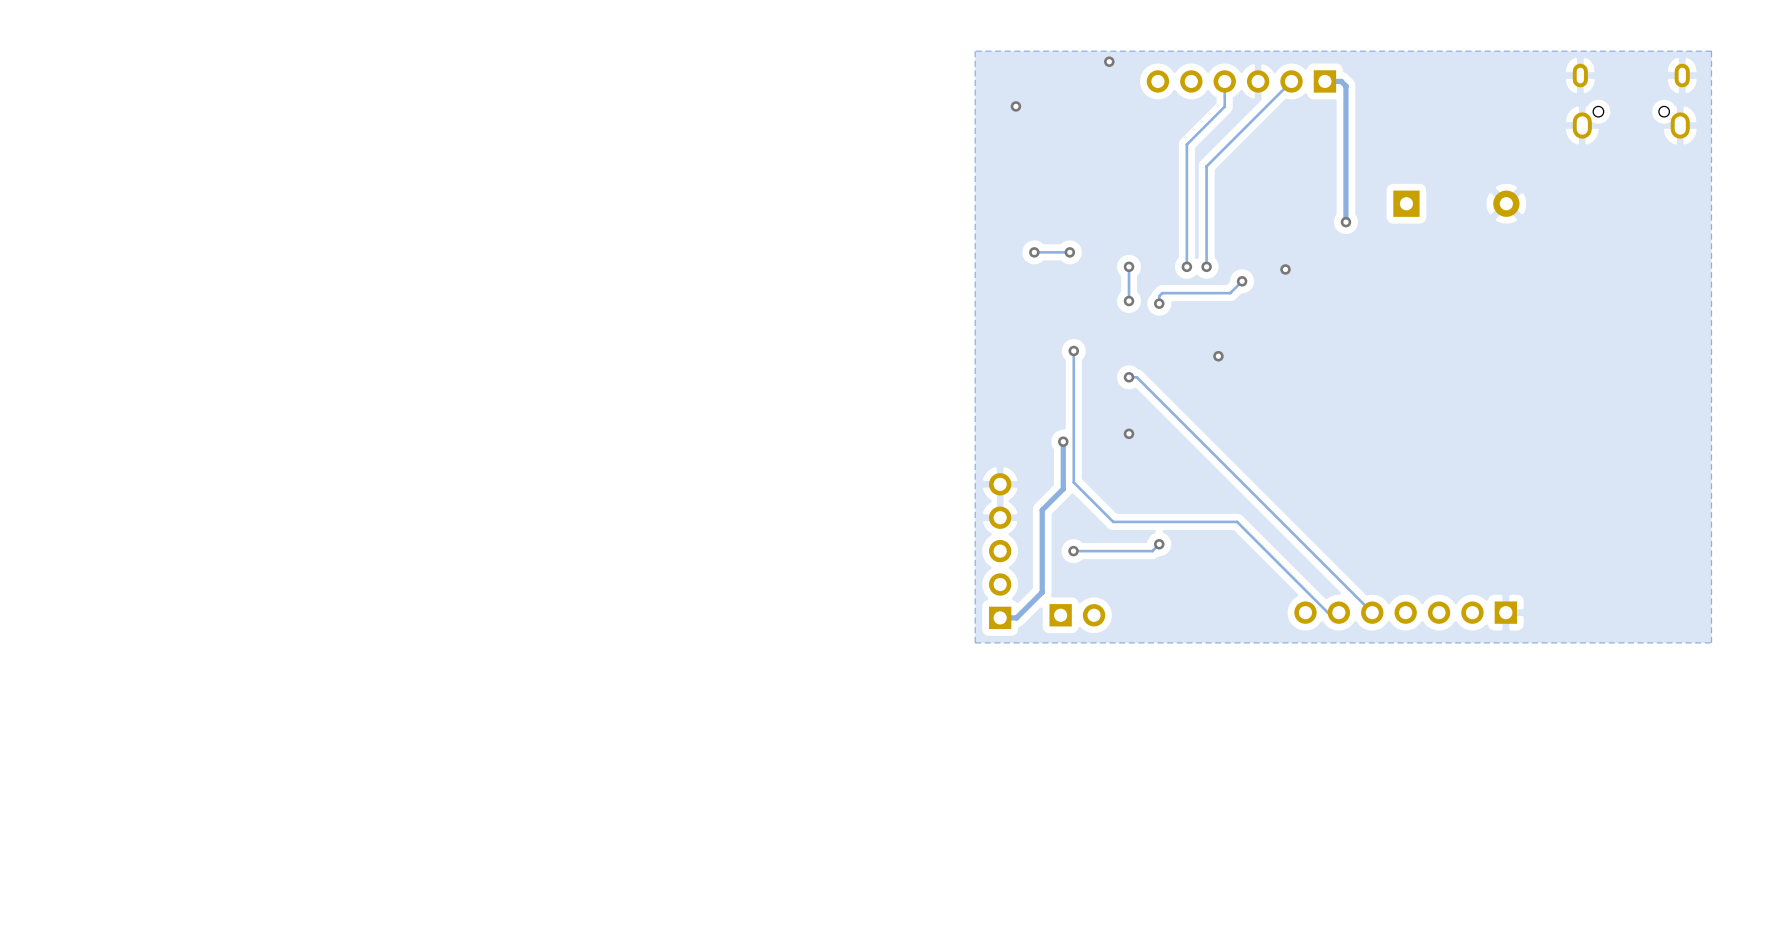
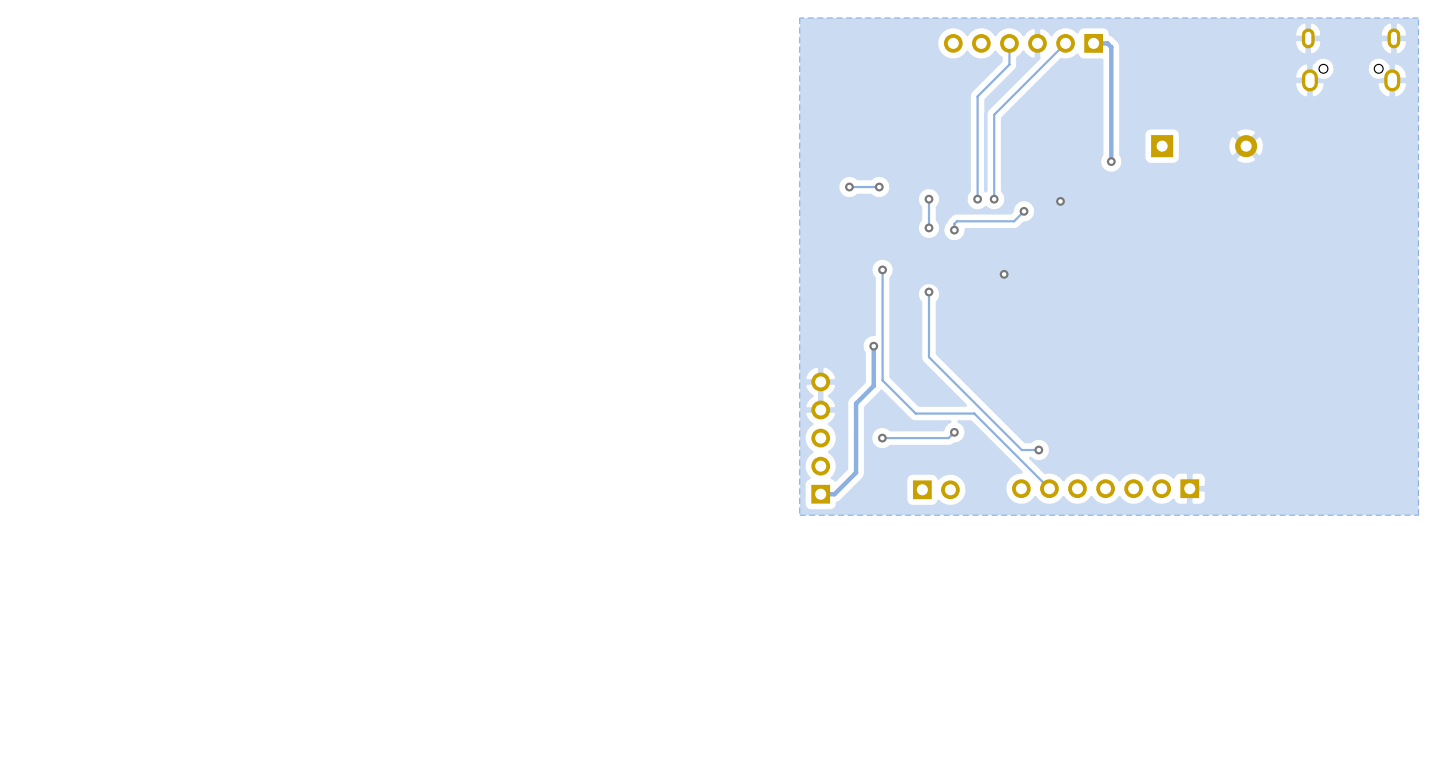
via: (1109, 61) -> none
via: (1015, 106) -> none
track: (1129, 377) (1136, 377) (1372, 612) -> none
track: none -> (928, 294) (928, 357) (1021, 450) (1038, 450)
via: (1129, 433) -> none
track: (1182, 521) (1237, 521) (1327, 612) (1338, 612) -> (974, 413) (1049, 488)
via: none -> (1038, 450)
part position: (1405, 612) -> (1105, 488)
part position: (1077, 615) -> (936, 489)

